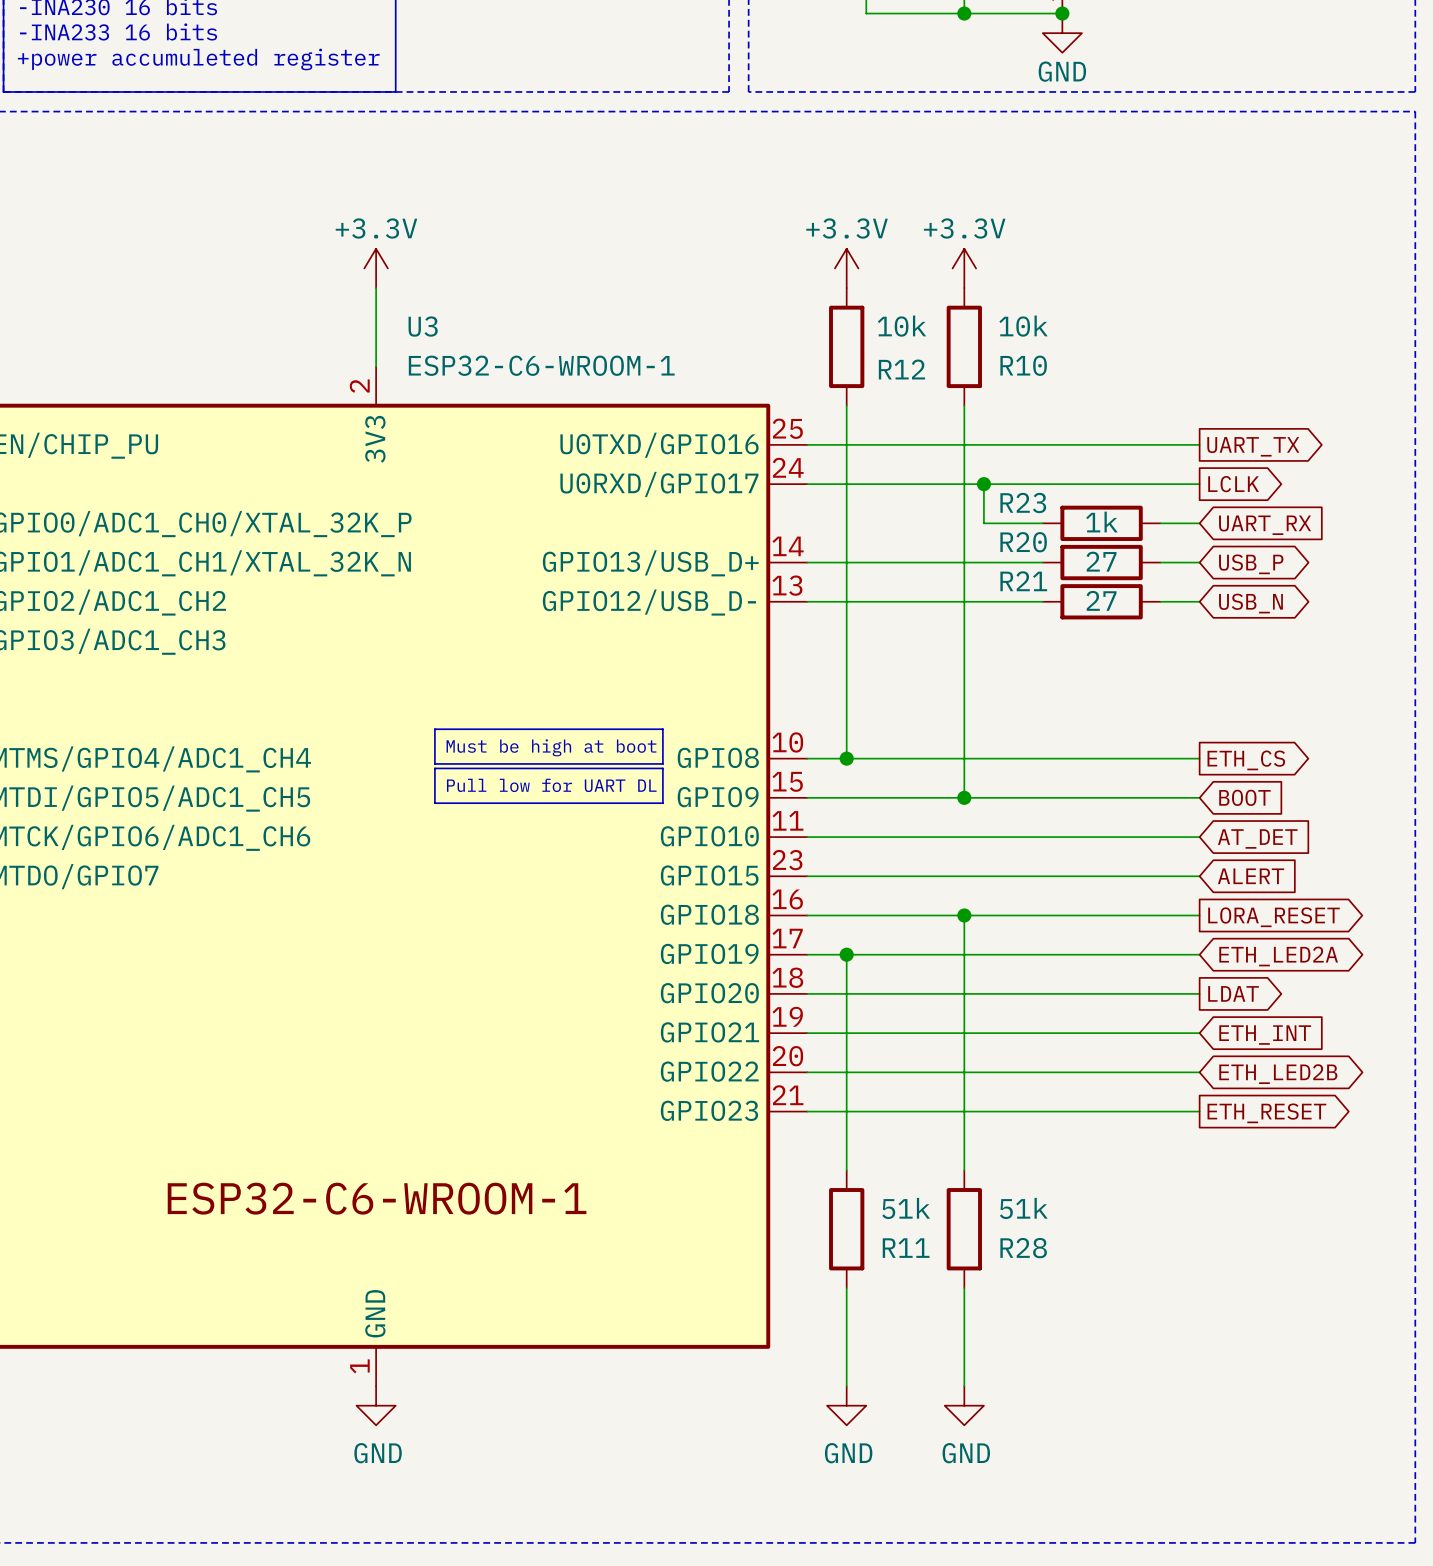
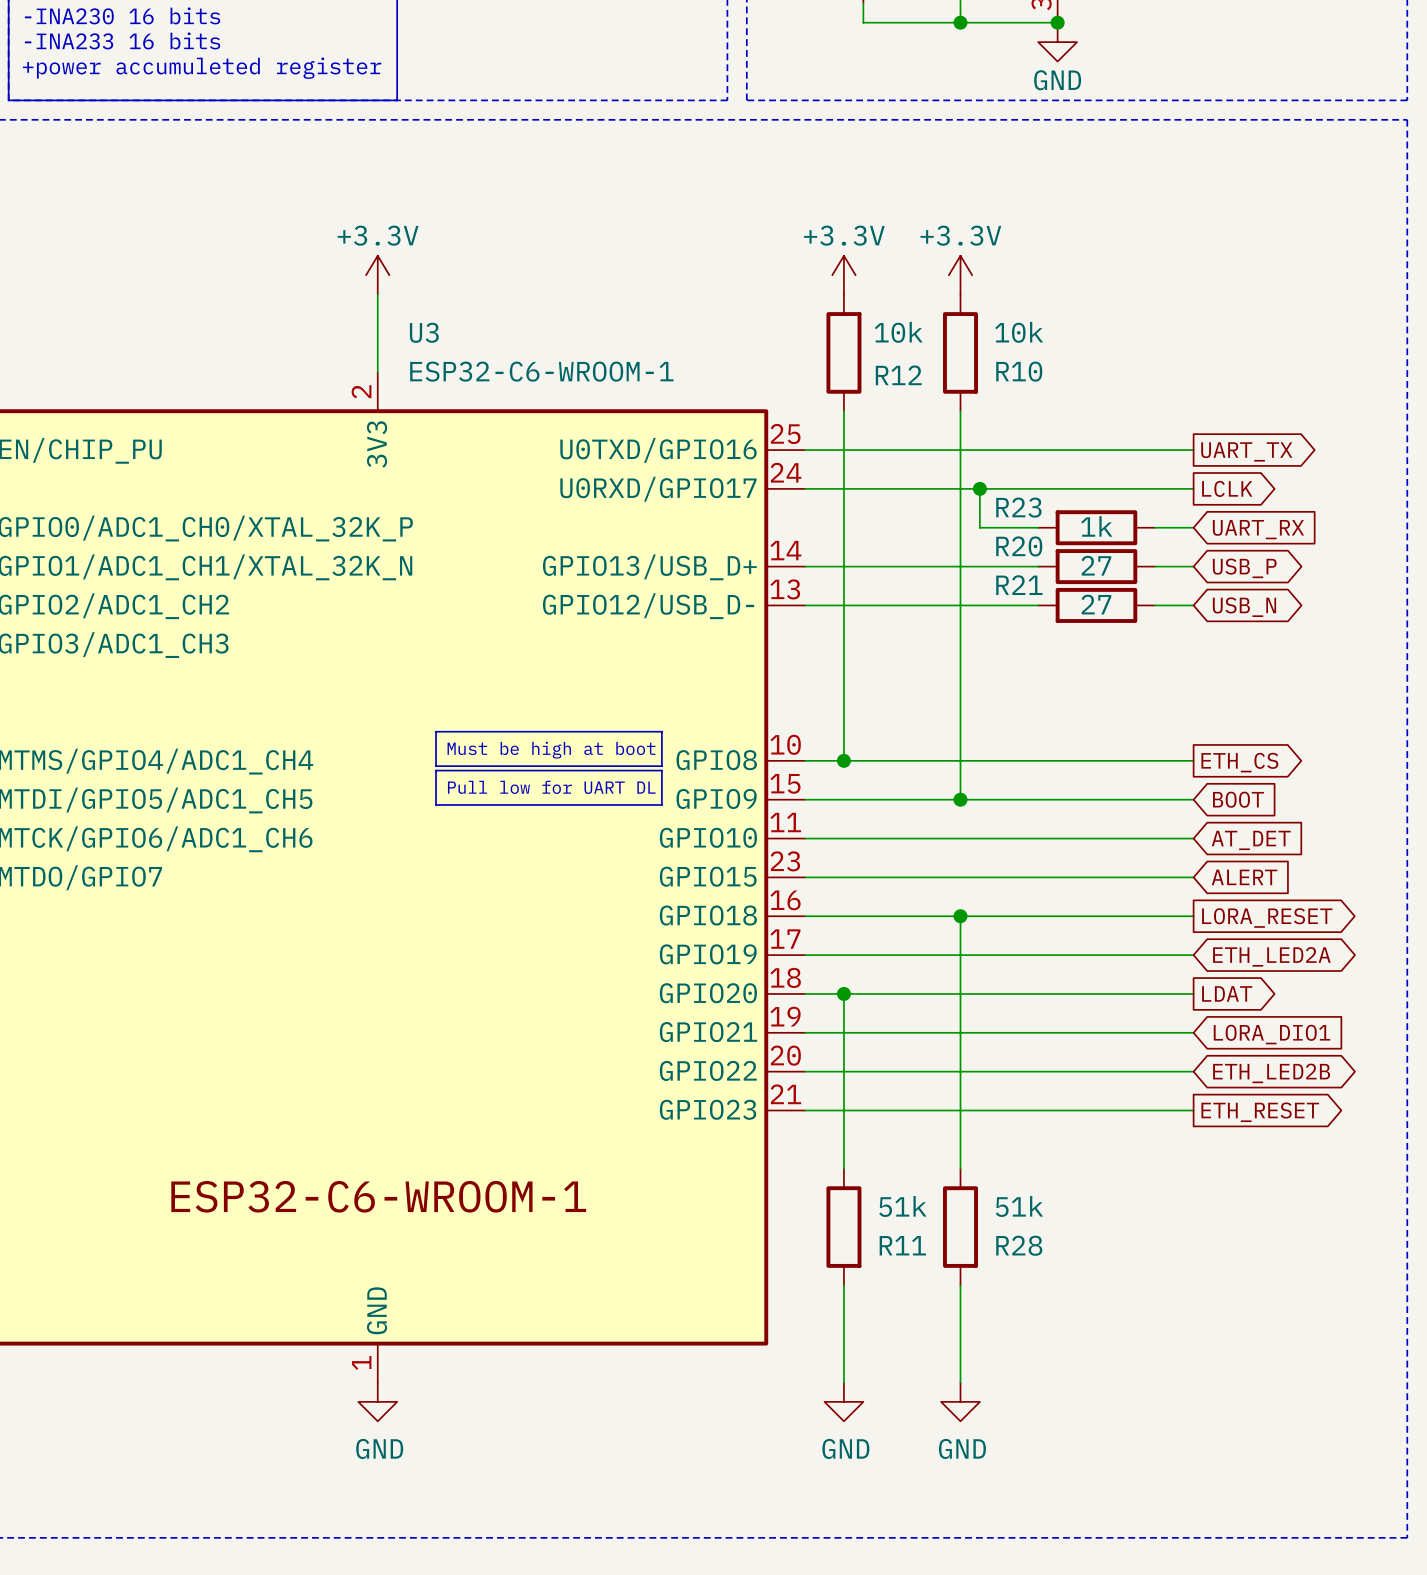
wire: (846, 954) (846, 993) -> none
junction position: (846, 954) -> (843, 993)
global label: ETH_INT (1265, 1035) -> LORA_DIO1 (1272, 1034)

